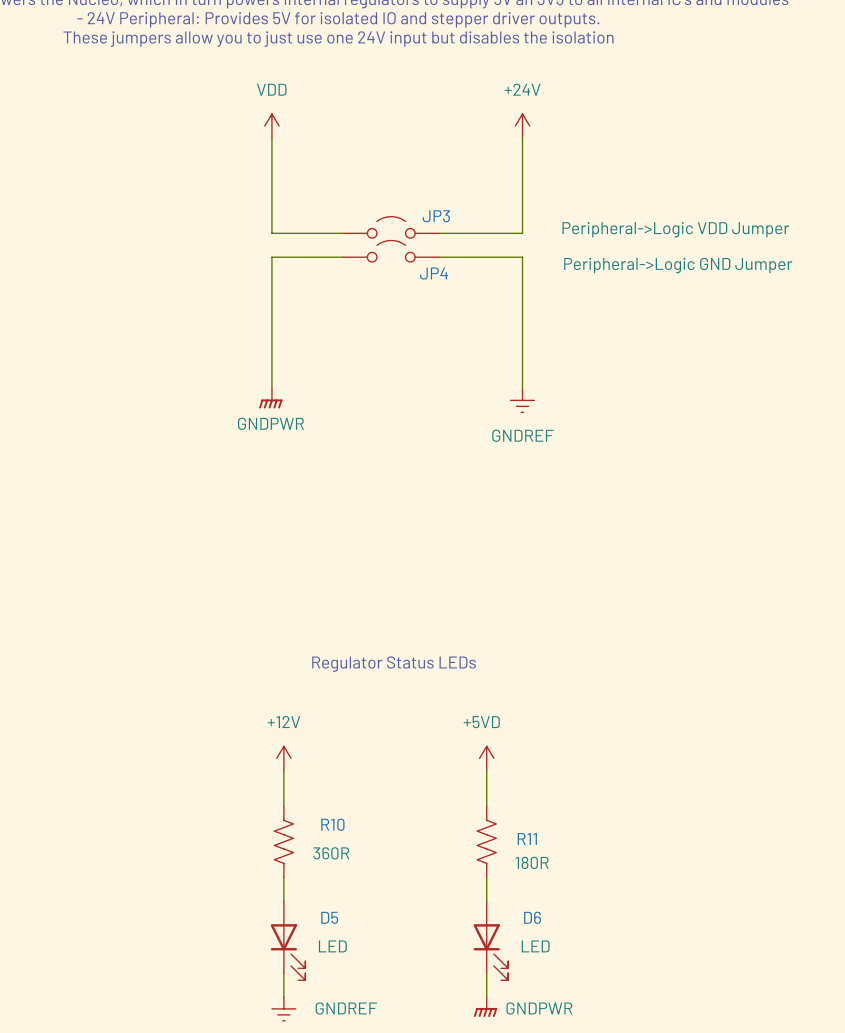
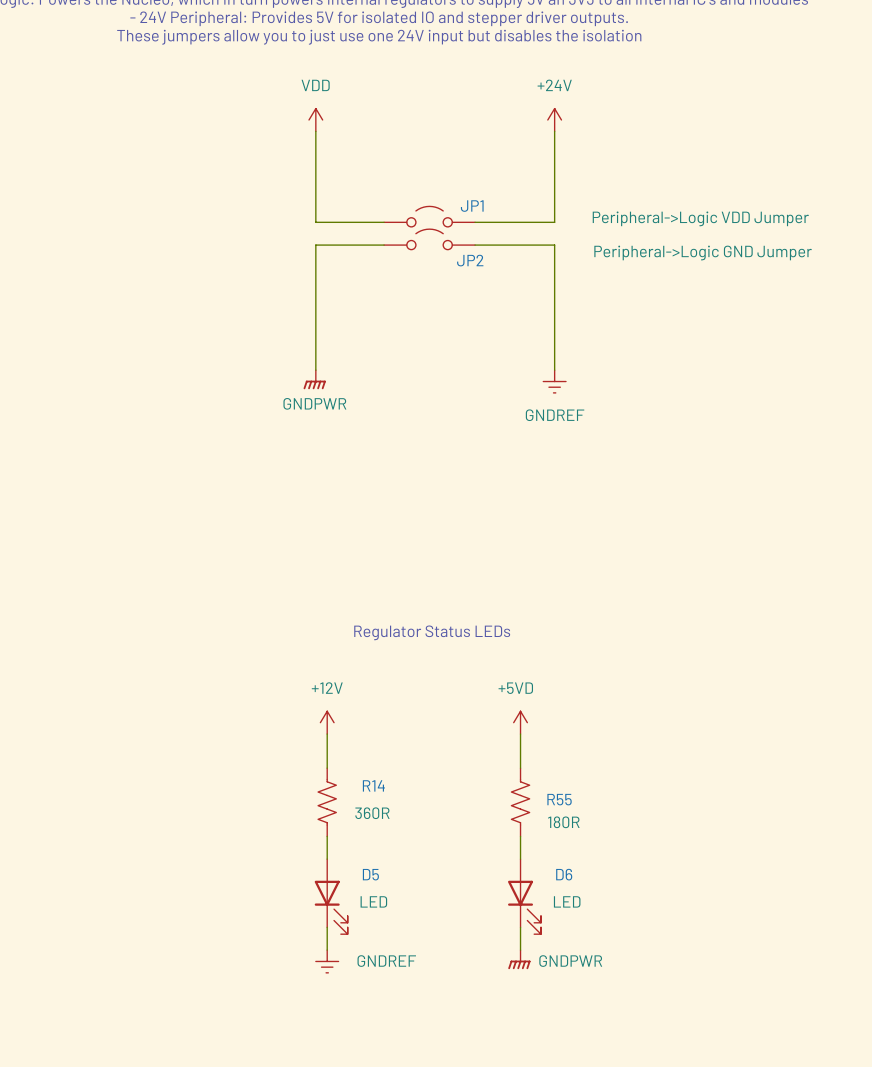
JP3 name: JP3 (436, 216) -> JP1 (472, 206)
JP4 name: JP4 (433, 273) -> JP2 (470, 260)
R10 name: R10 (332, 824) -> R14 (373, 785)
R11 name: R11 (527, 839) -> R55 (559, 799)

